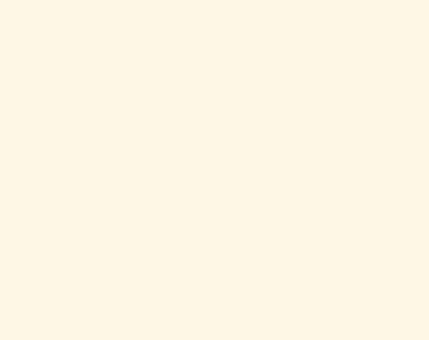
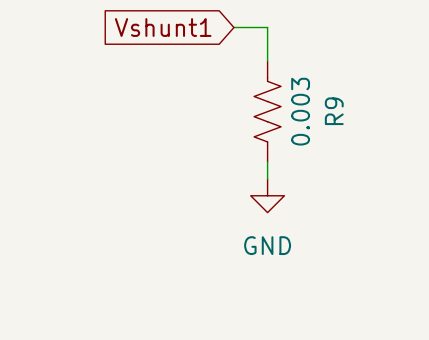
global label: none -> Vshunt1 (163, 27)
wire: none -> (233, 27) (267, 27) (267, 61)
R9: none -> 0.003 (267, 111)
wire: none -> (267, 162) (267, 178)
power symbol: none -> GND (267, 195)

